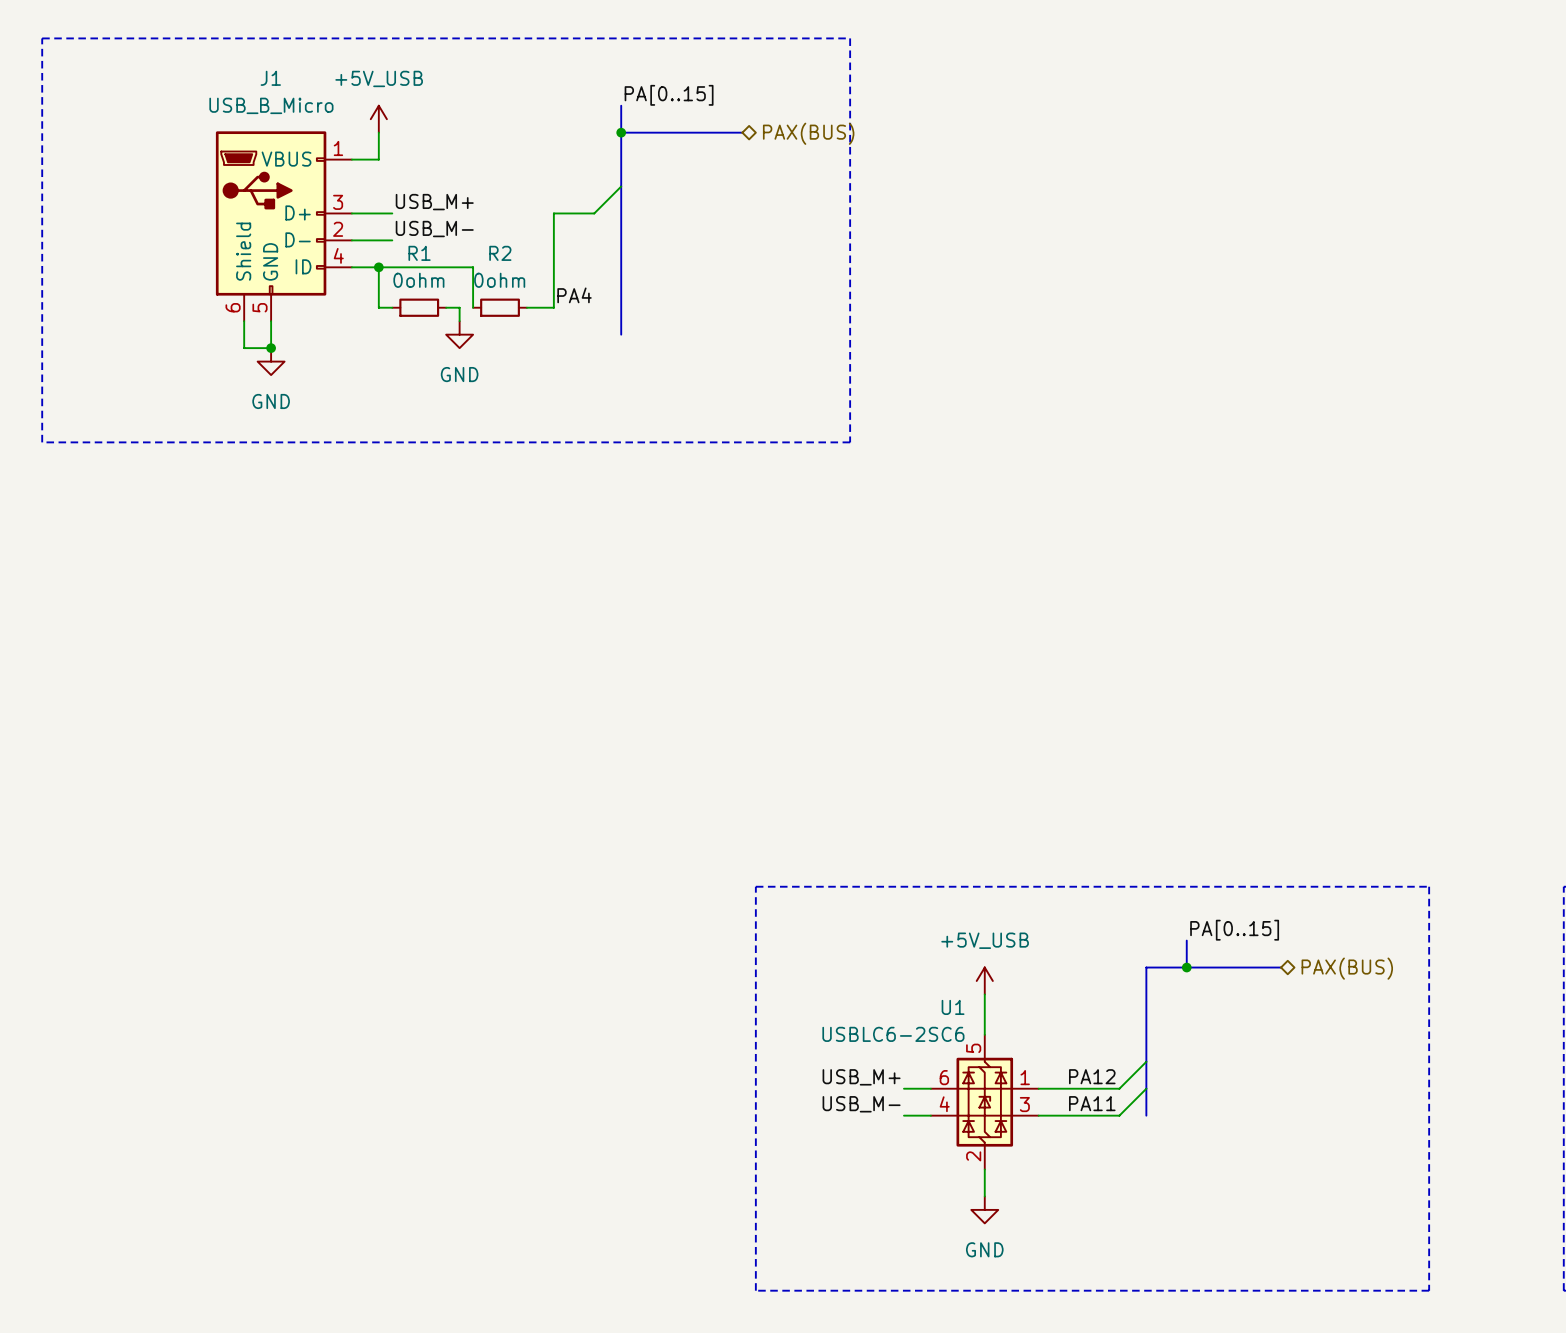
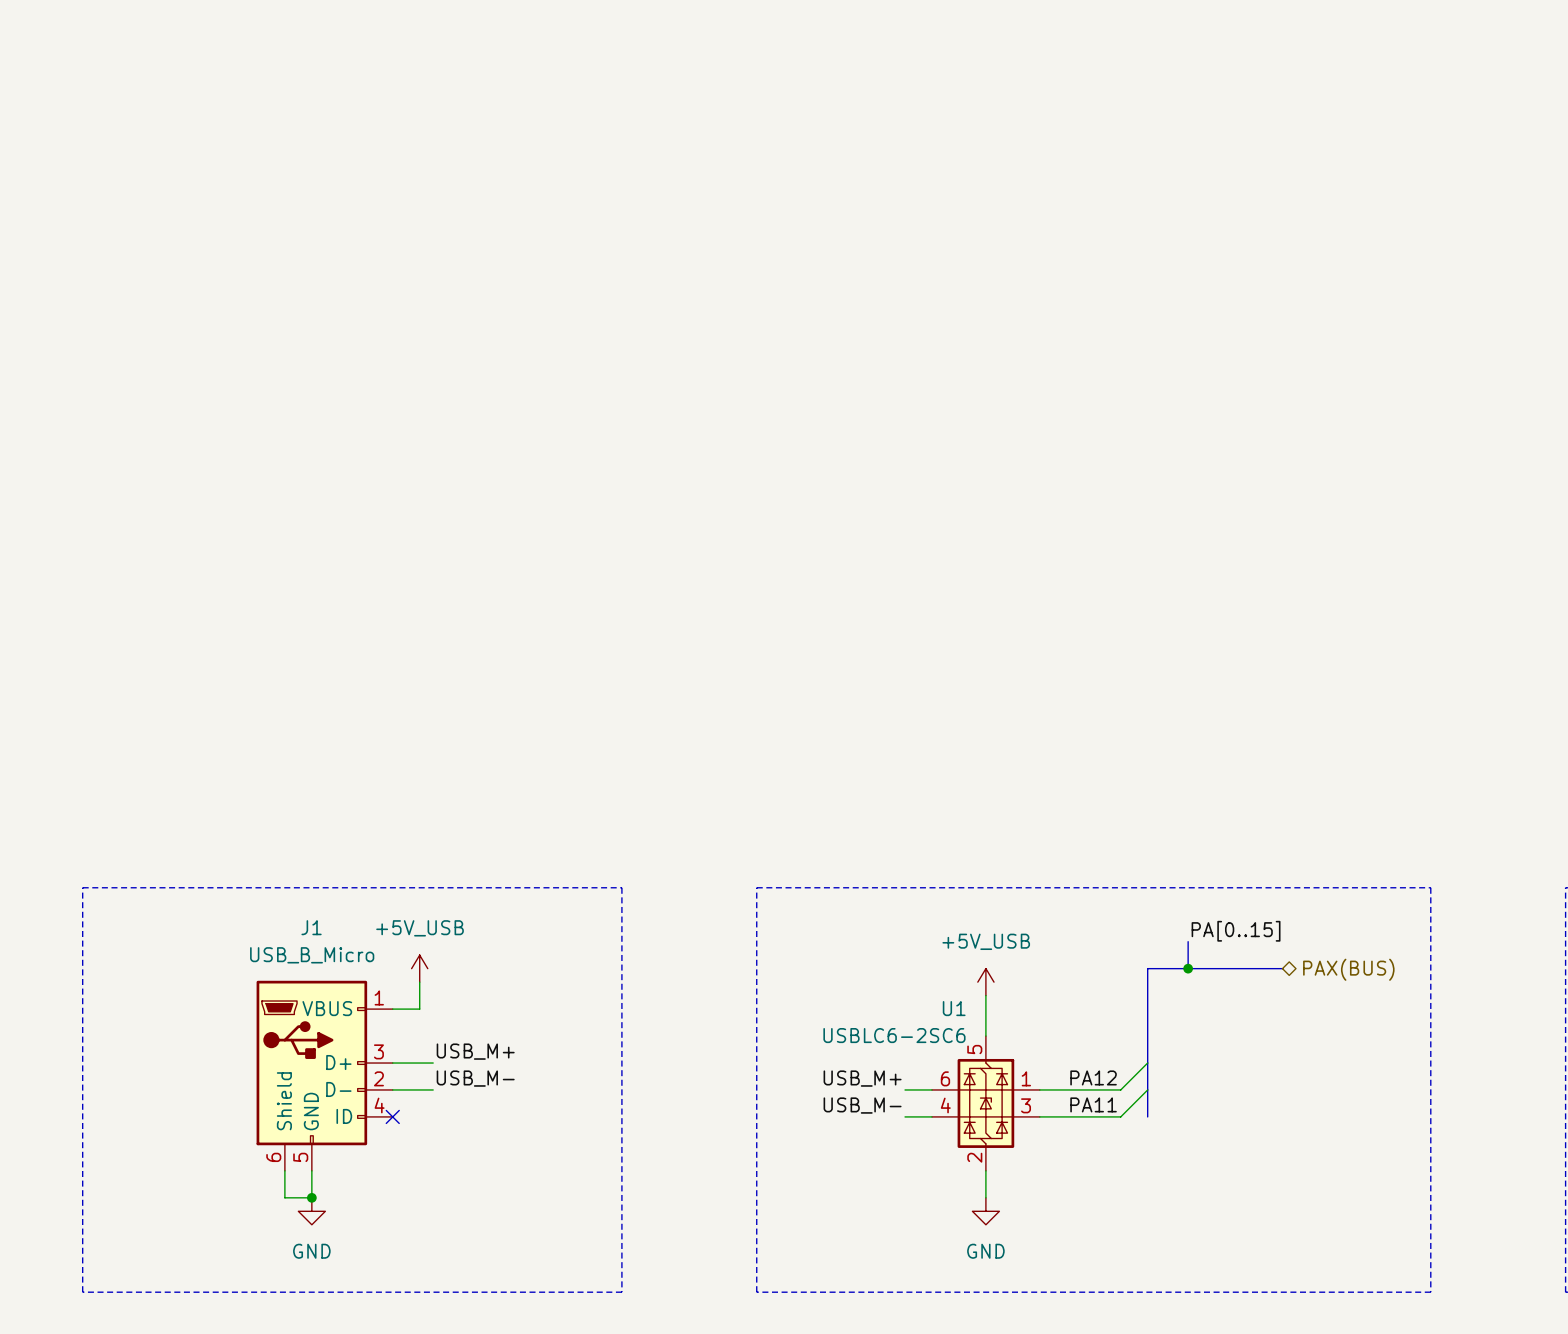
line: (42, 38) (850, 38) (850, 442) (42, 442) (42, 38) -> none
label: PA[0..15] (669, 95) -> none
bus: (621, 105) (621, 334) -> none
power symbol: +5V_USB (378, 119) -> none
wire: (378, 132) (378, 159) (351, 159) -> none
bus: (621, 132) (742, 132) -> none
junction: (621, 132) -> none
hierarchical label: PAX(BUS) (808, 133) -> none
wire: (621, 186) (594, 213) (553, 213) (553, 307) (526, 307) -> none
label: USB_M+ (434, 202) -> none
wire: (351, 213) (392, 213) -> none
J1 position: (283, 226) -> (324, 1075)
label: USB_M- (434, 229) -> none
wire: (351, 240) (392, 240) -> none
wire: (351, 267) (473, 267) (473, 307) -> none
wire: (378, 267) (378, 307) (392, 307) -> none
junction: (378, 267) -> none
label: PA4 (574, 295) -> none
R1: 0ohm (419, 307) -> none
wire: (446, 307) (459, 307) (459, 321) -> none
R2: 0ohm (500, 307) -> none
wire: (244, 321) (244, 348) (271, 348) (271, 321) -> none
power symbol: GND (459, 334) -> none
junction: (271, 348) -> none
power symbol: GND (271, 361) -> none
line: none -> (82, 887) (621, 887) (621, 1292) (82, 1292) (82, 887)
power symbol: none -> +5V_USB (419, 968)
wire: none -> (419, 982) (419, 1009) (392, 1009)
label: none -> USB_M+ (475, 1051)
wire: none -> (392, 1063) (433, 1063)
label: none -> USB_M- (475, 1078)
wire: none -> (392, 1089) (433, 1089)
no-connect mark: none -> (392, 1116)
wire: none -> (284, 1170) (284, 1197) (311, 1197) (311, 1170)
junction: none -> (311, 1197)
power symbol: none -> GND (311, 1211)

